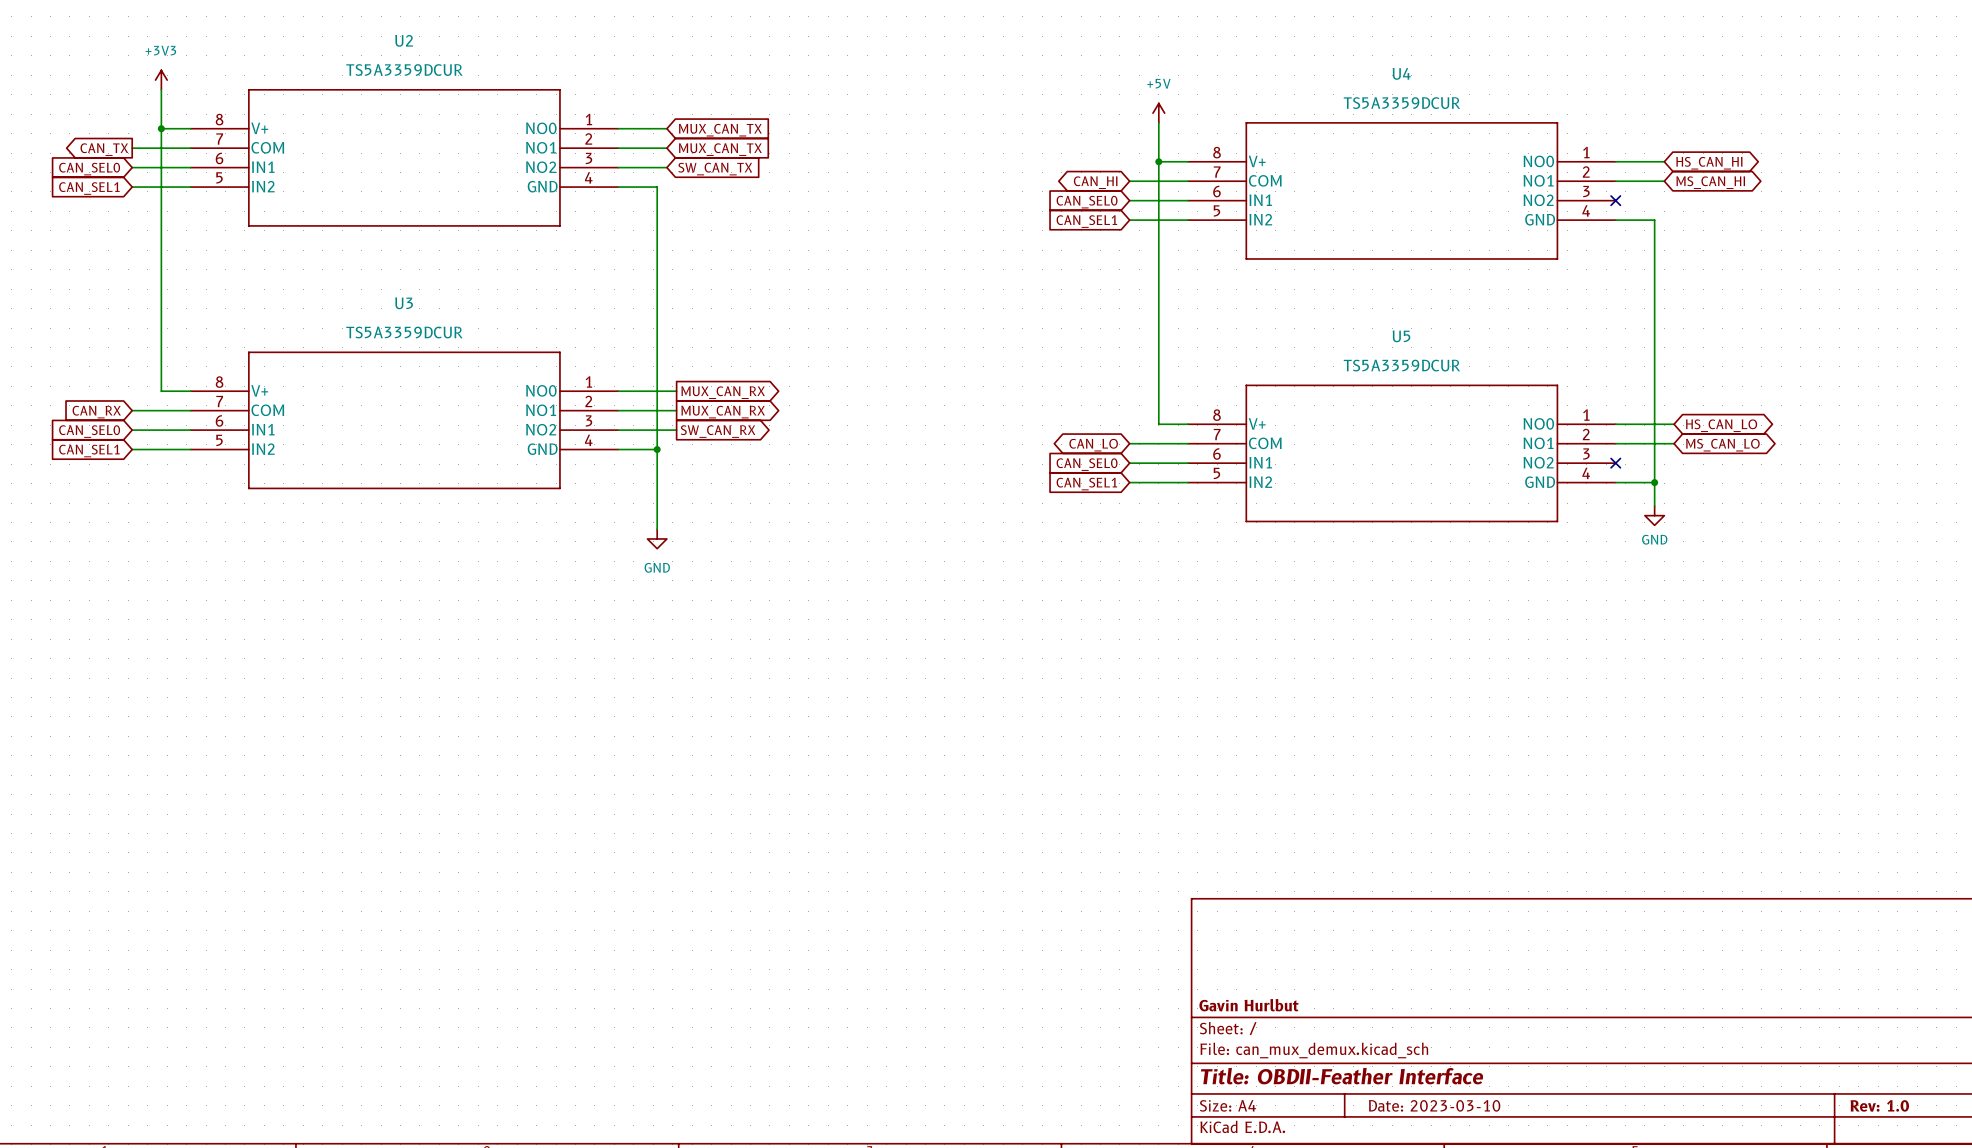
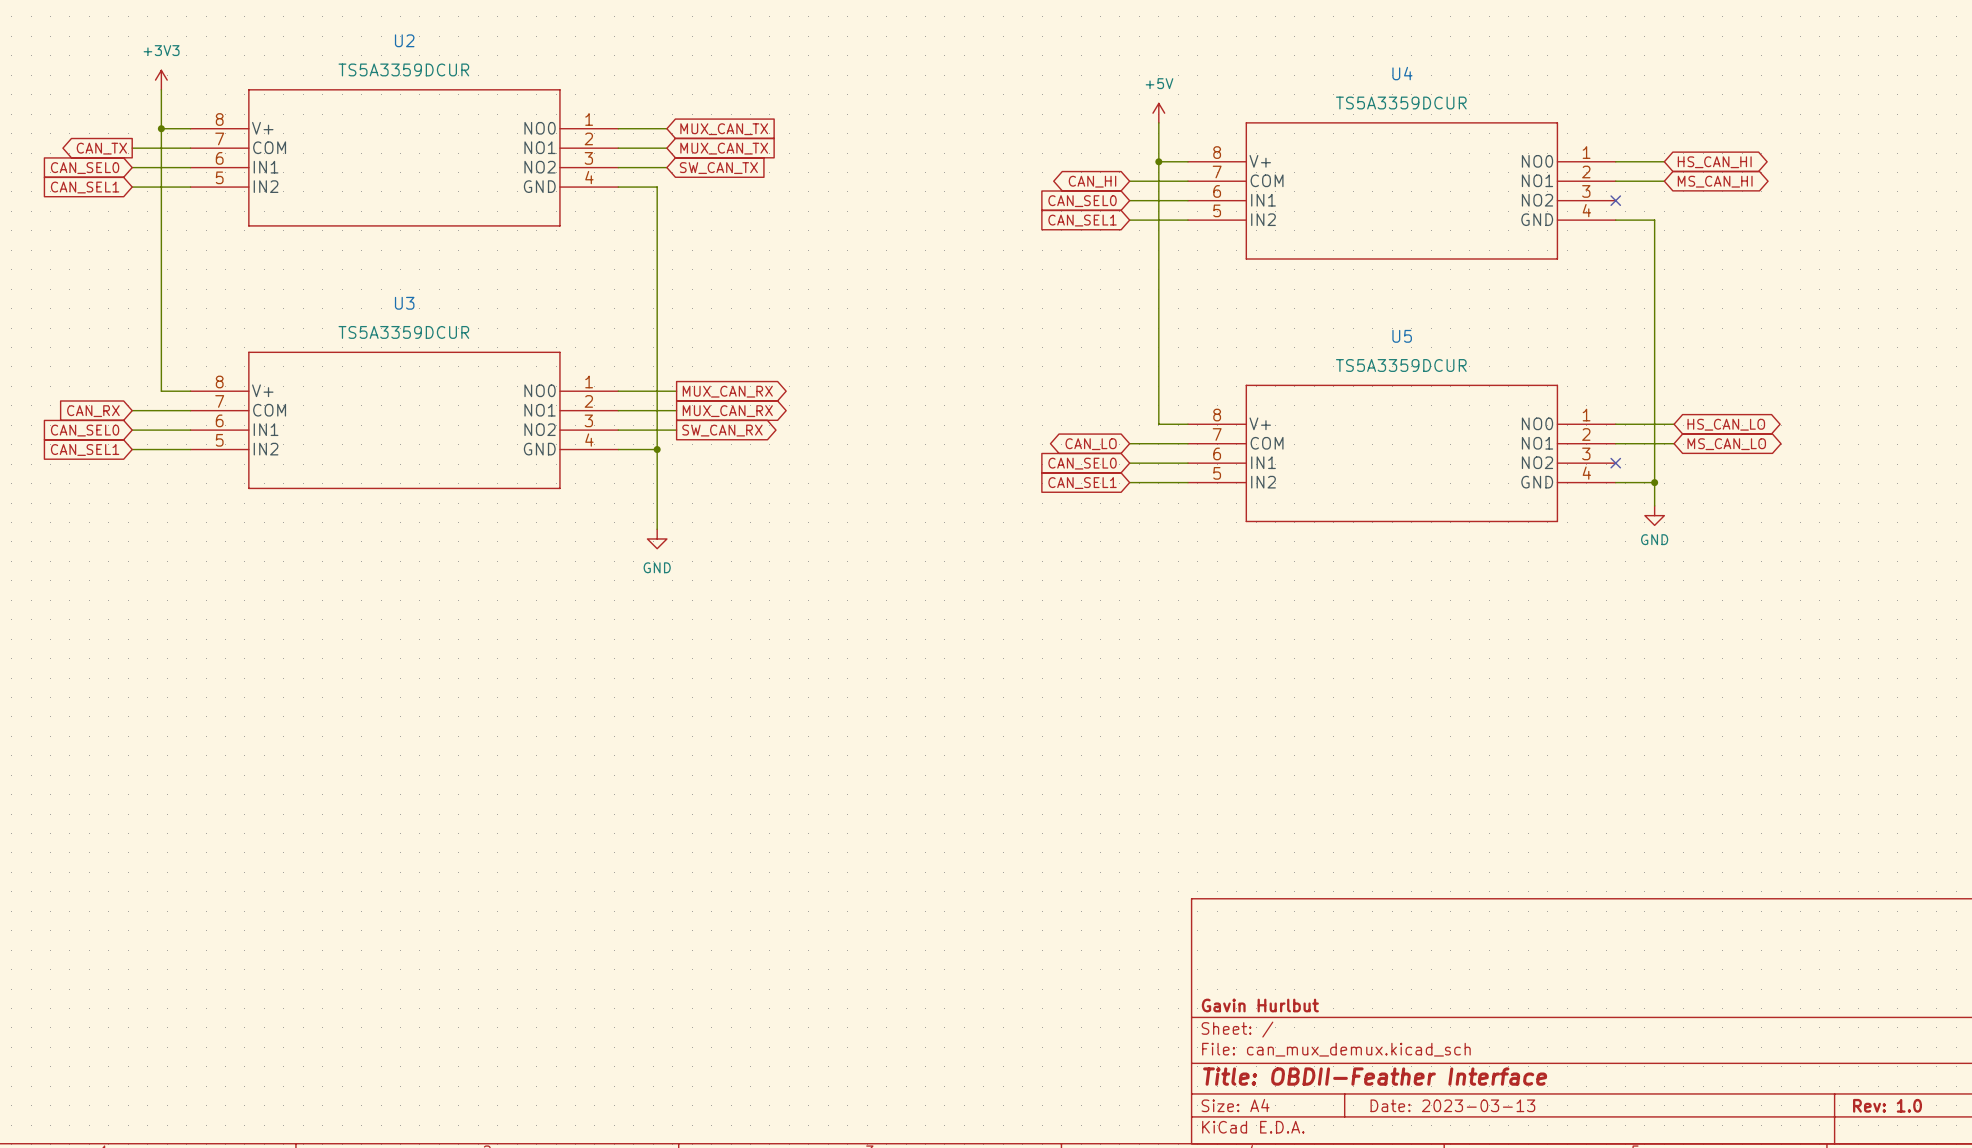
title block: Date: 2023-03-10 (1434, 1105) -> Date: 2023-03-13 (1452, 1105)

